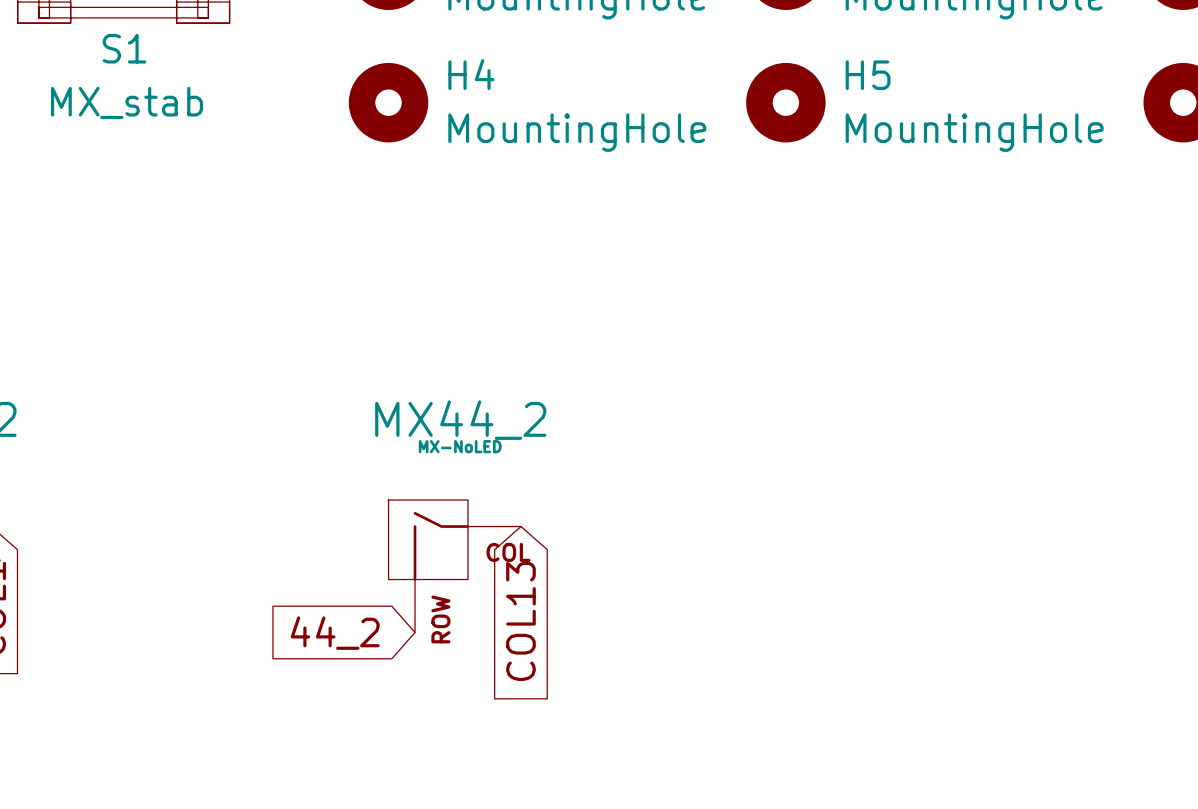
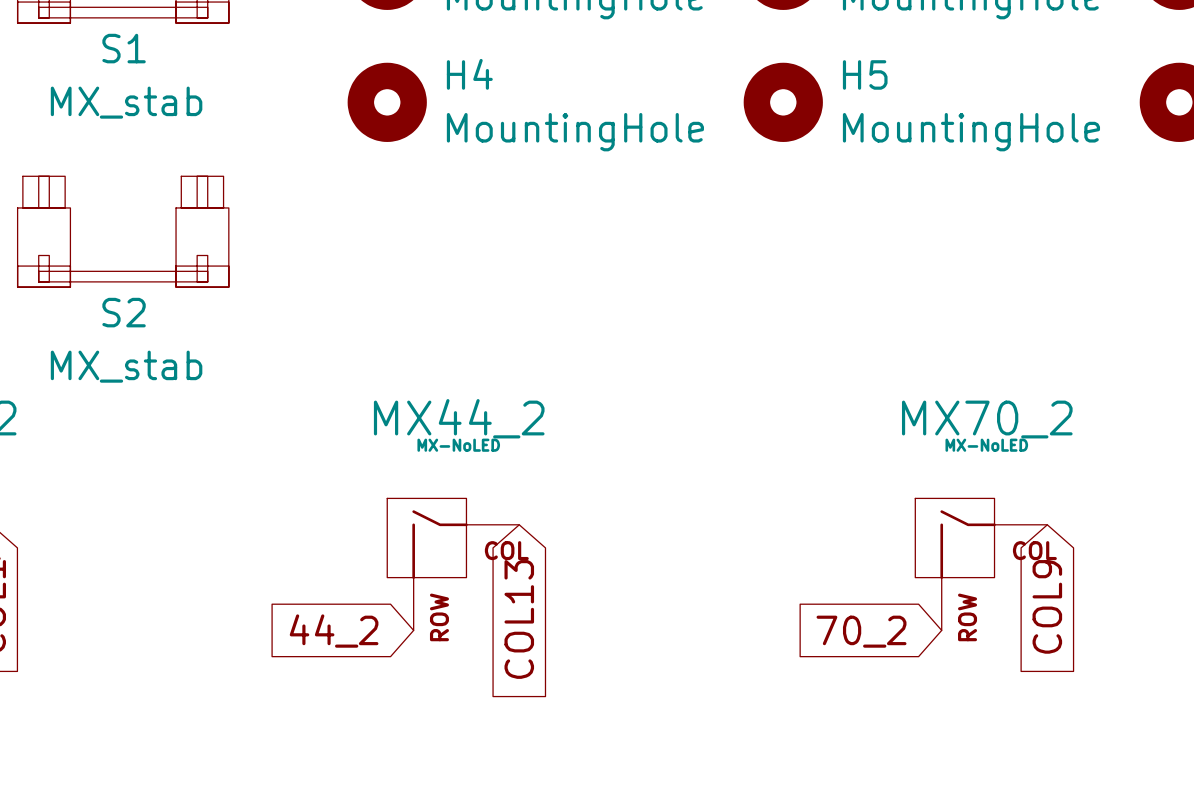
S2: none -> MX_stab (123, 231)
MX70_2: none -> MX-NoLED (981, 564)
global label: none -> COL9 (1047, 606)
global label: none -> 70_2 (861, 631)

